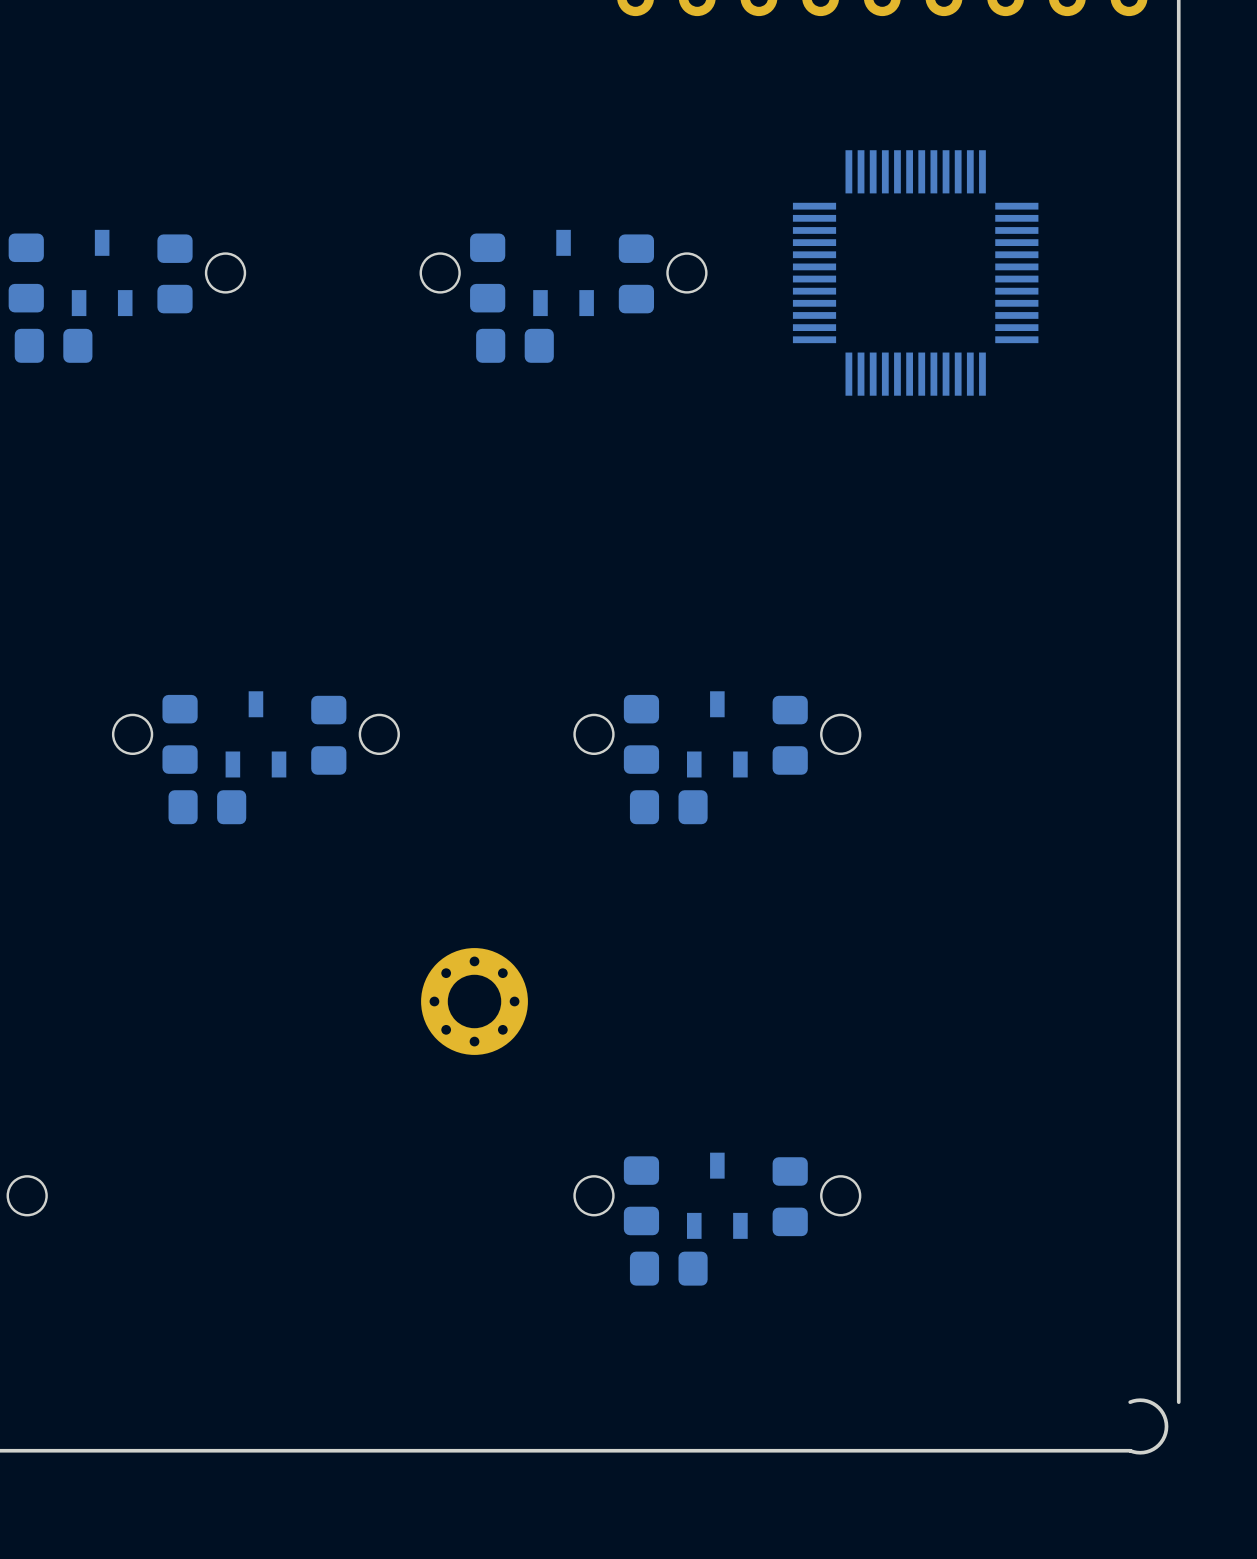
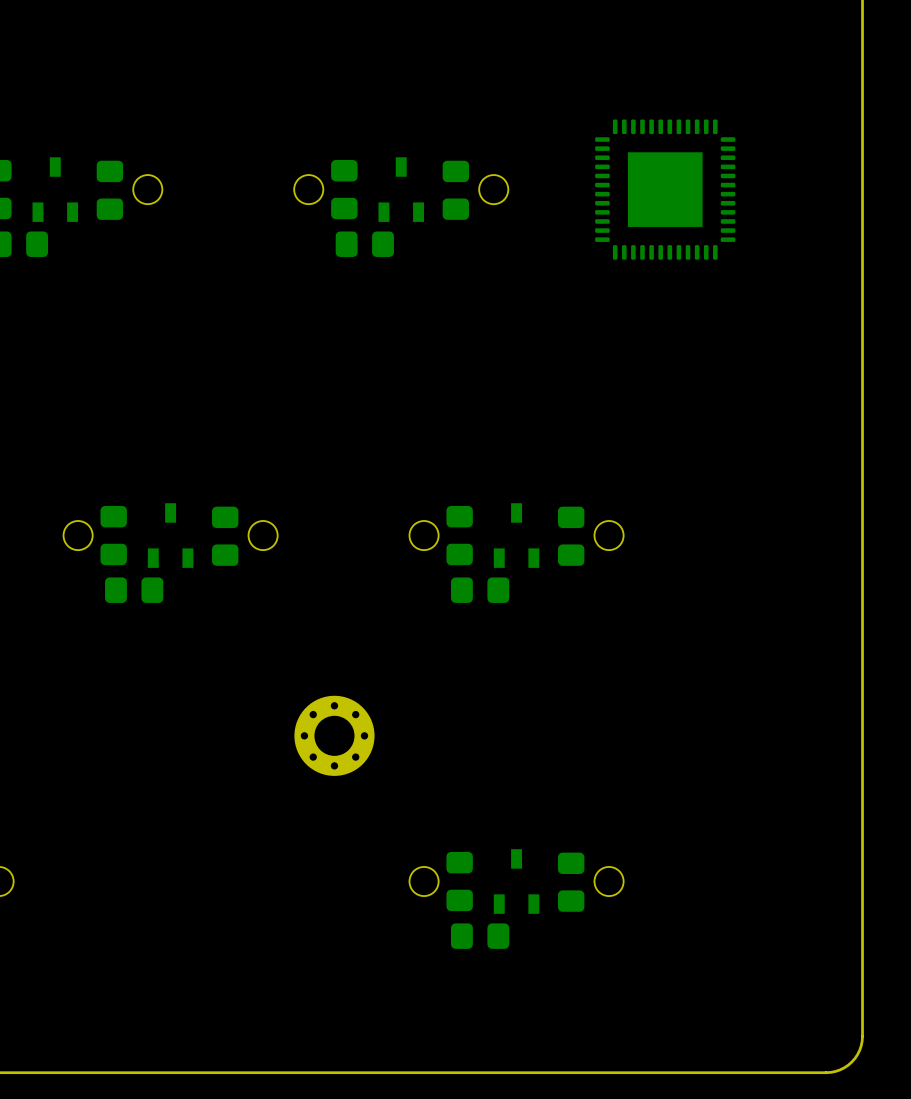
part footprint: [792, 150, 1039, 396] -> [595, 119, 736, 260]
board edge: (1130, 1402) (1140, 1400) (1153, 1403) (1163, 1413) (1166, 1426) (1163, 1439) (1153, 1449) (1140, 1452) (1130, 1450) -> (862, 1036) (859, 1050) (851, 1062) (840, 1069) (826, 1072)

